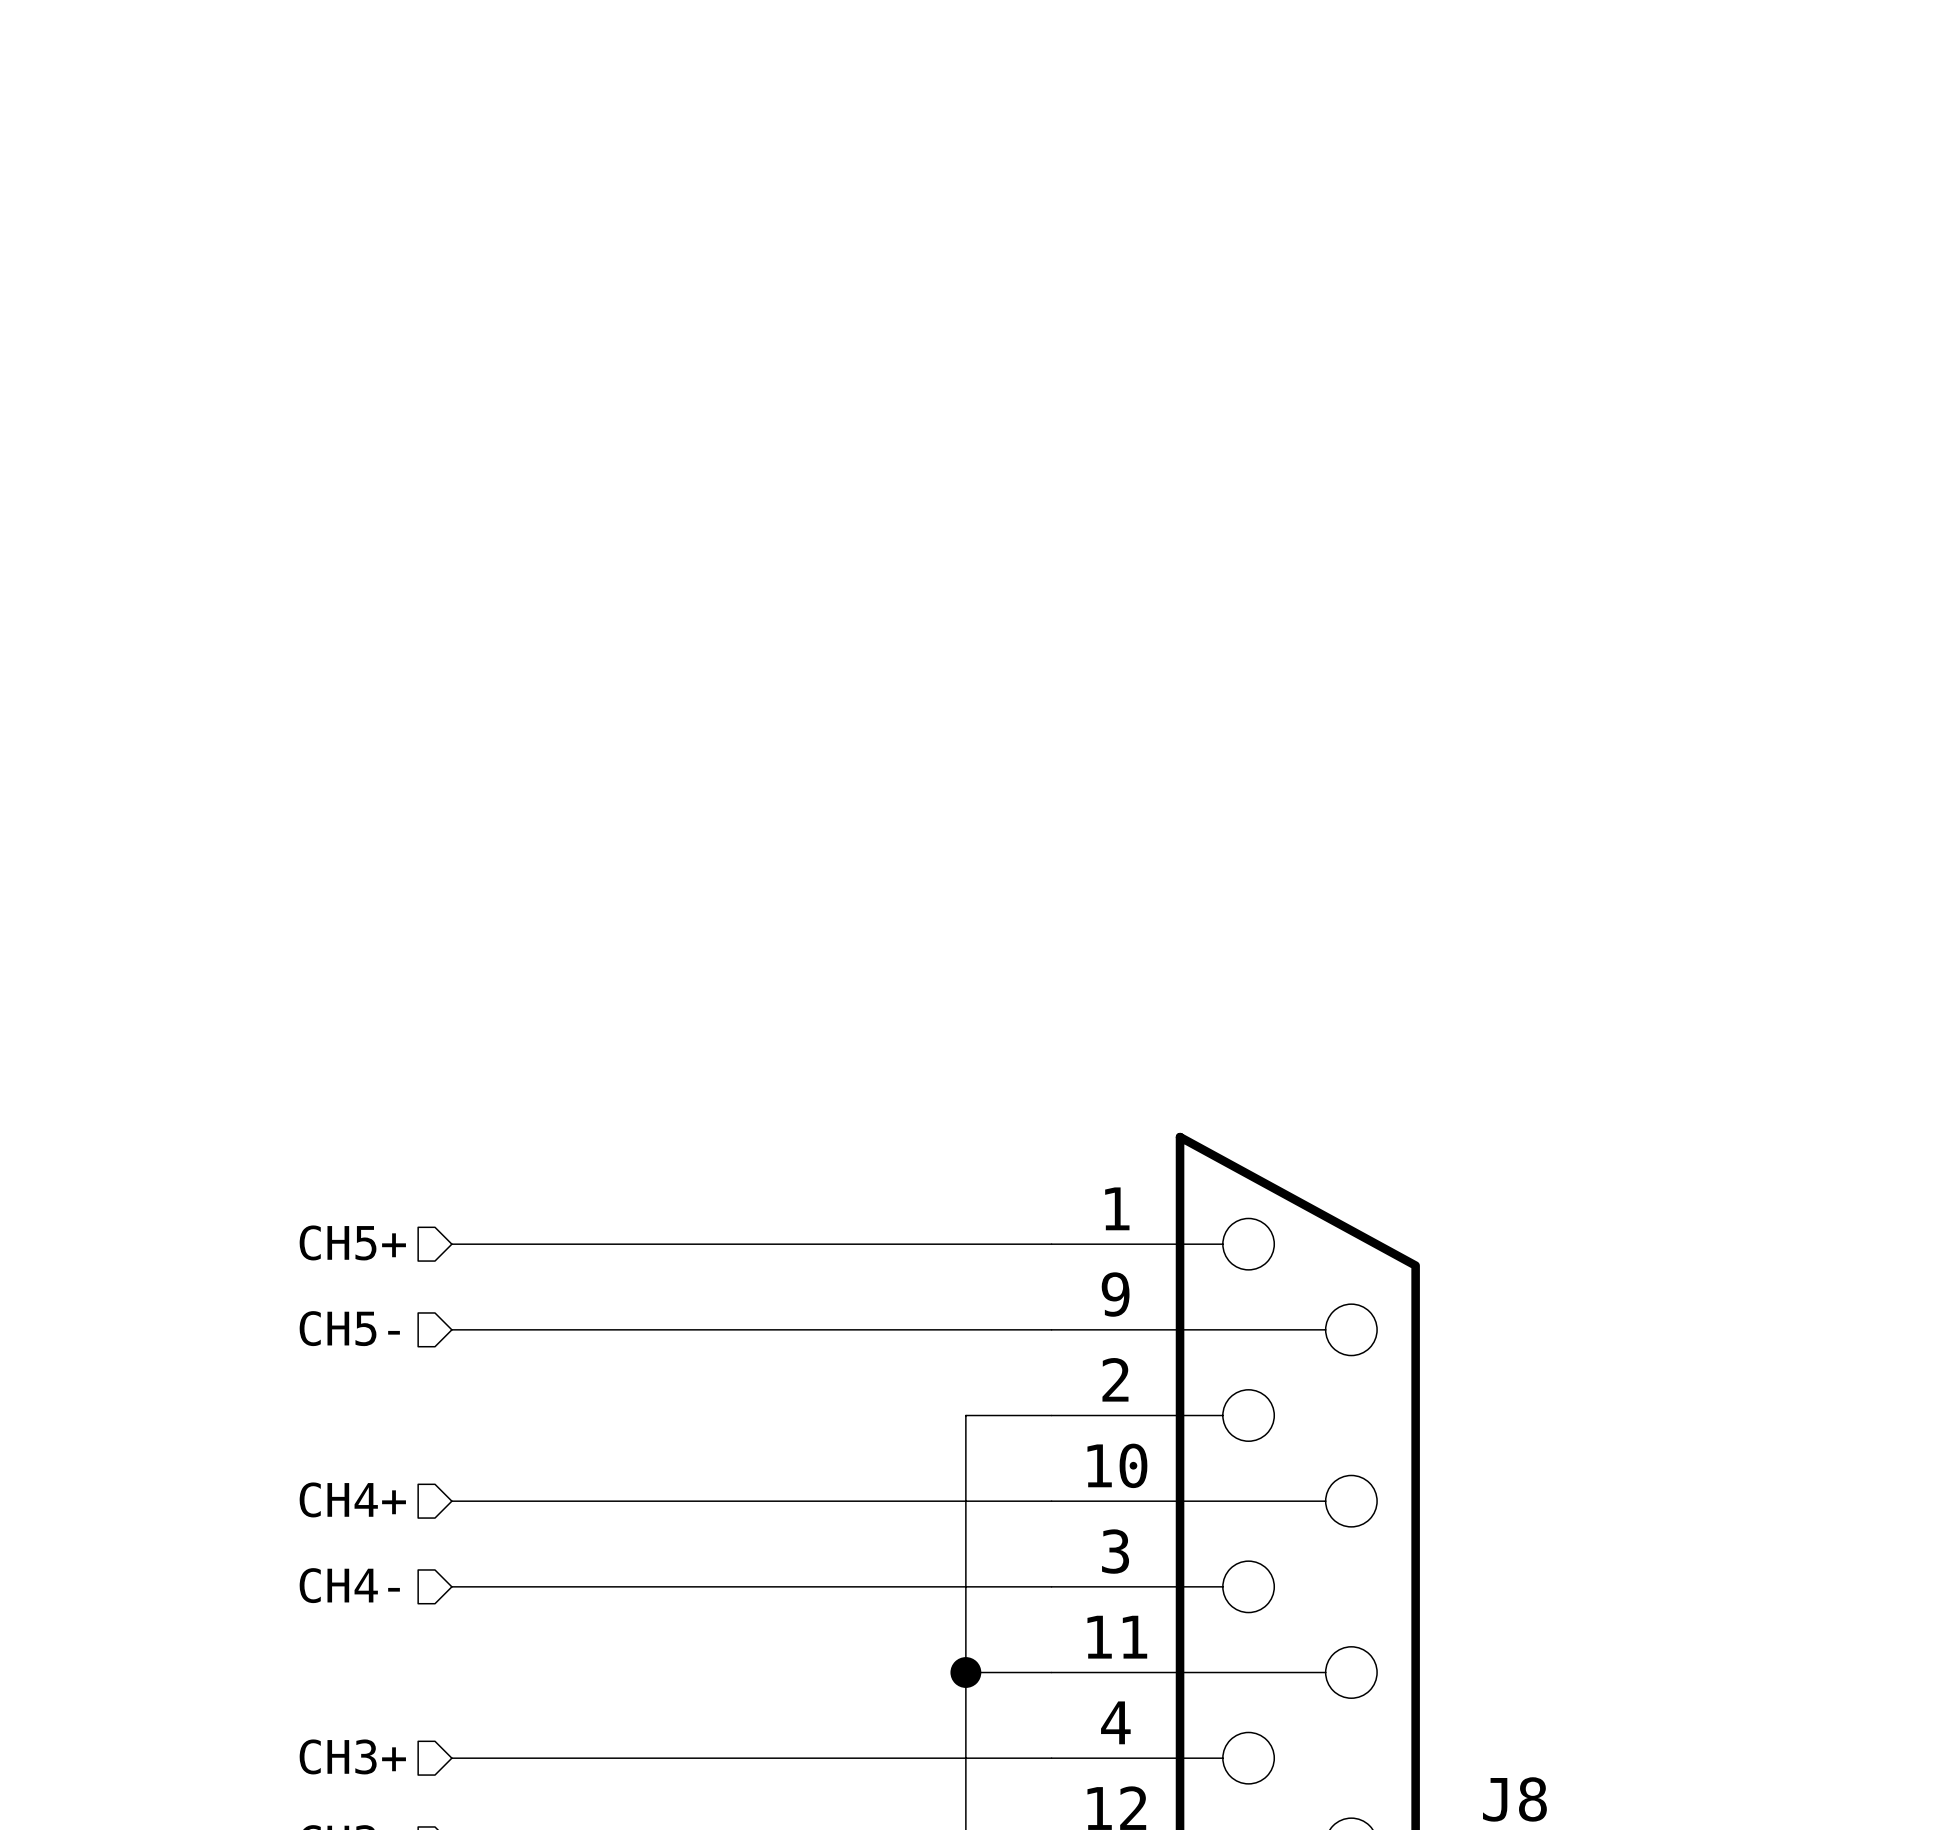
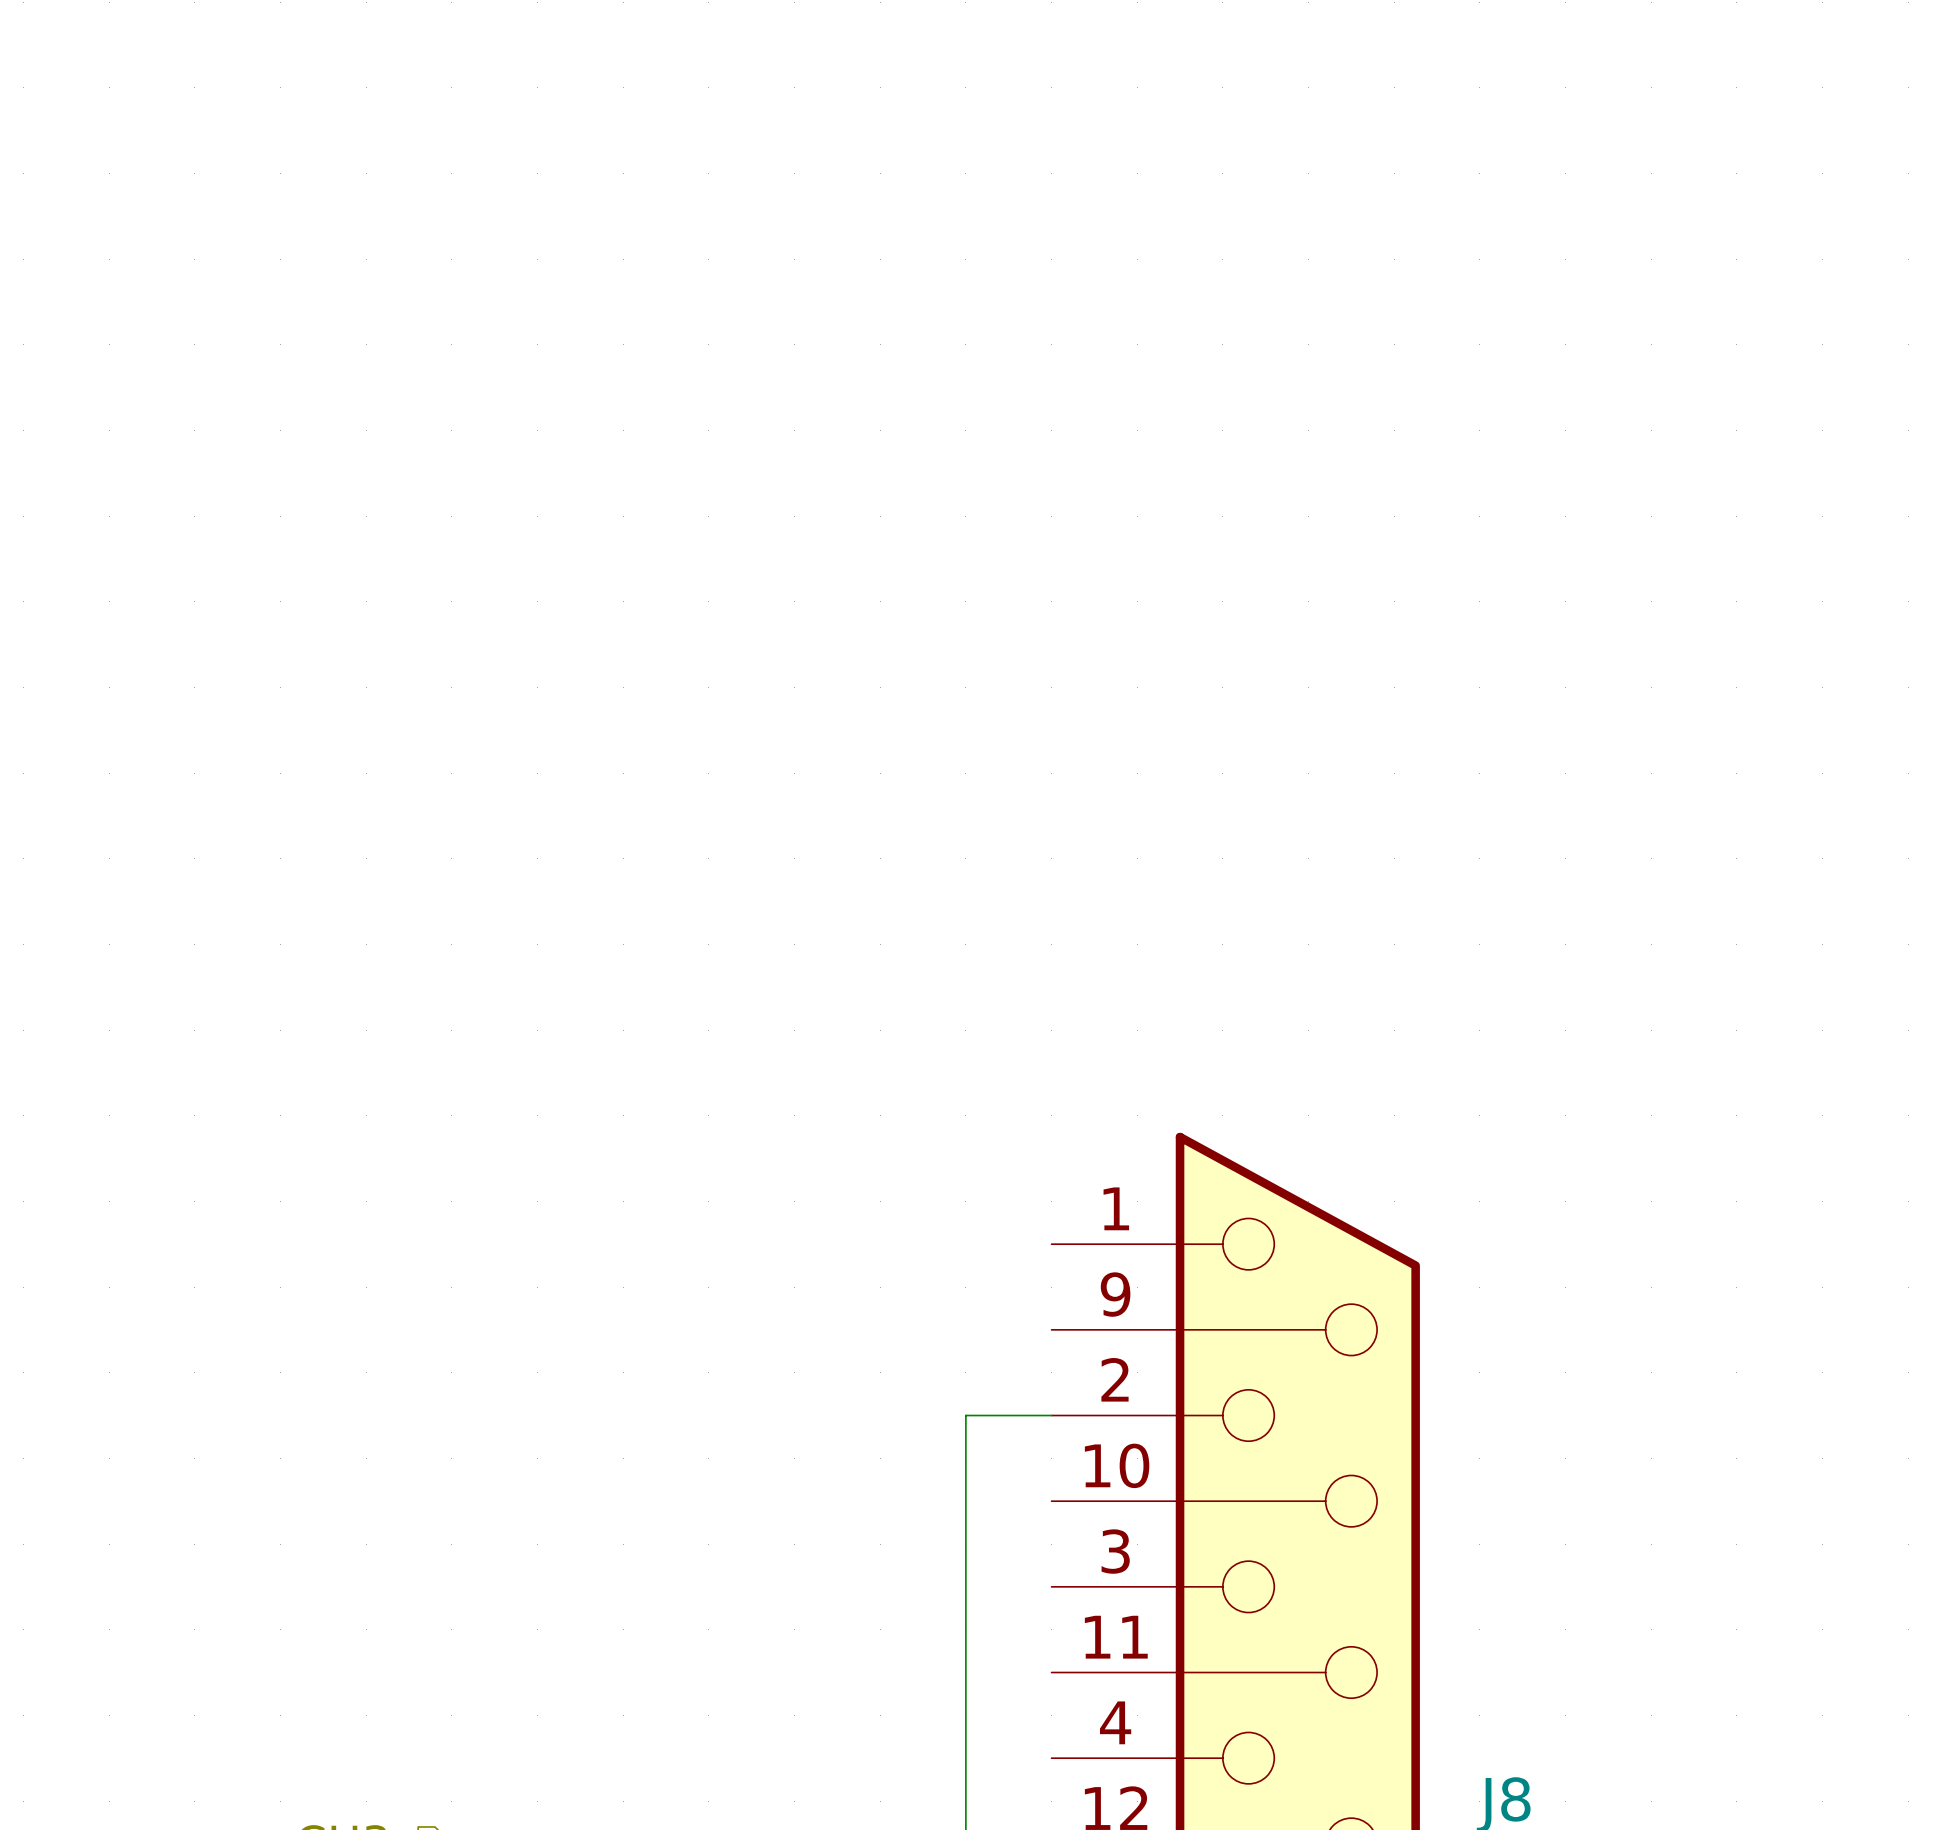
hierarchical label: CH5+ (352, 1242) -> none
wire: (451, 1244) (1051, 1244) -> none
hierarchical label: CH5- (349, 1328) -> none
wire: (451, 1329) (1051, 1329) -> none
hierarchical label: CH4+ (352, 1499) -> none
wire: (451, 1501) (1051, 1501) -> none
hierarchical label: CH4- (349, 1585) -> none
wire: (451, 1586) (1051, 1586) -> none
wire: (965, 1672) (1051, 1672) -> none
junction: (965, 1672) -> none
hierarchical label: CH3+ (352, 1756) -> none
wire: (451, 1758) (1051, 1758) -> none

